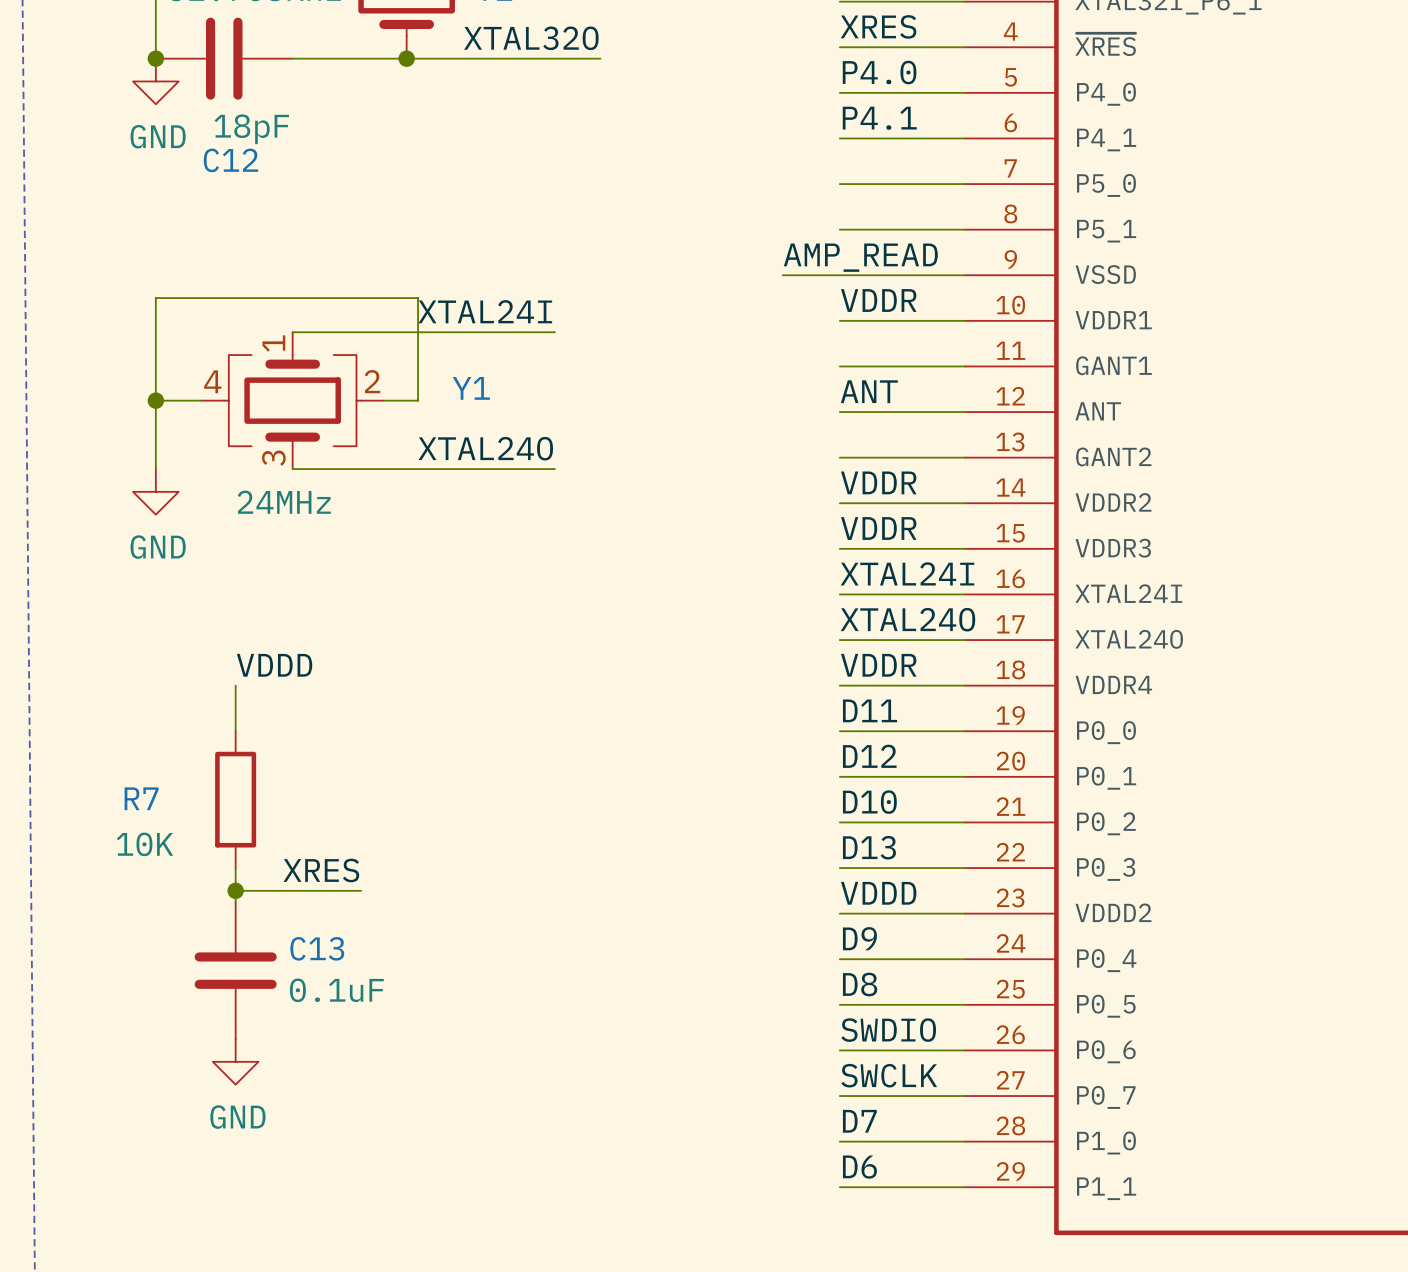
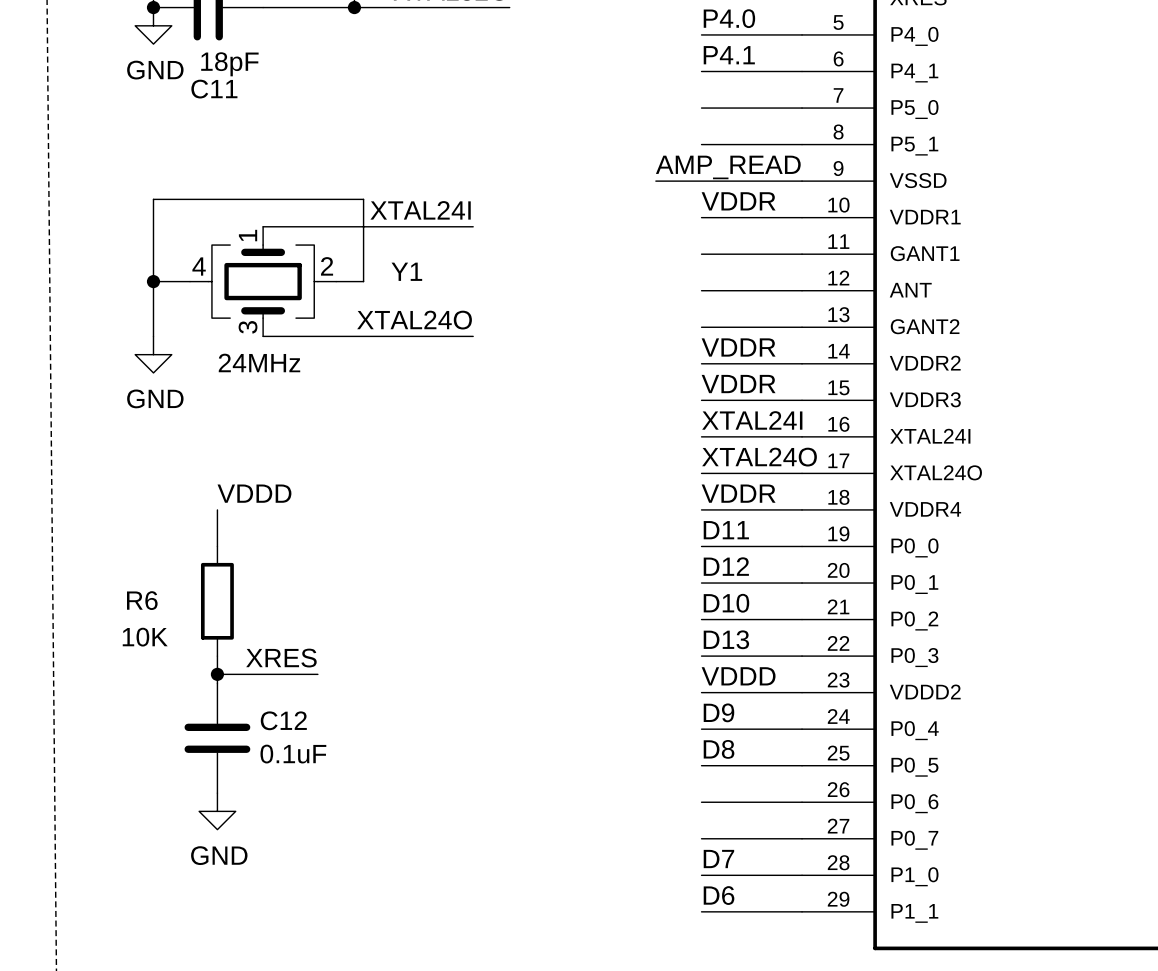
C12 name: C12 (230, 160) -> C11 (214, 89)
label: ANT (869, 391) -> none
R7 name: R7 (141, 798) -> R6 (142, 600)
C13 name: C13 (317, 948) -> C12 (283, 720)
label: SWDIO (888, 1030) -> none
label: SWCLK (889, 1075) -> none

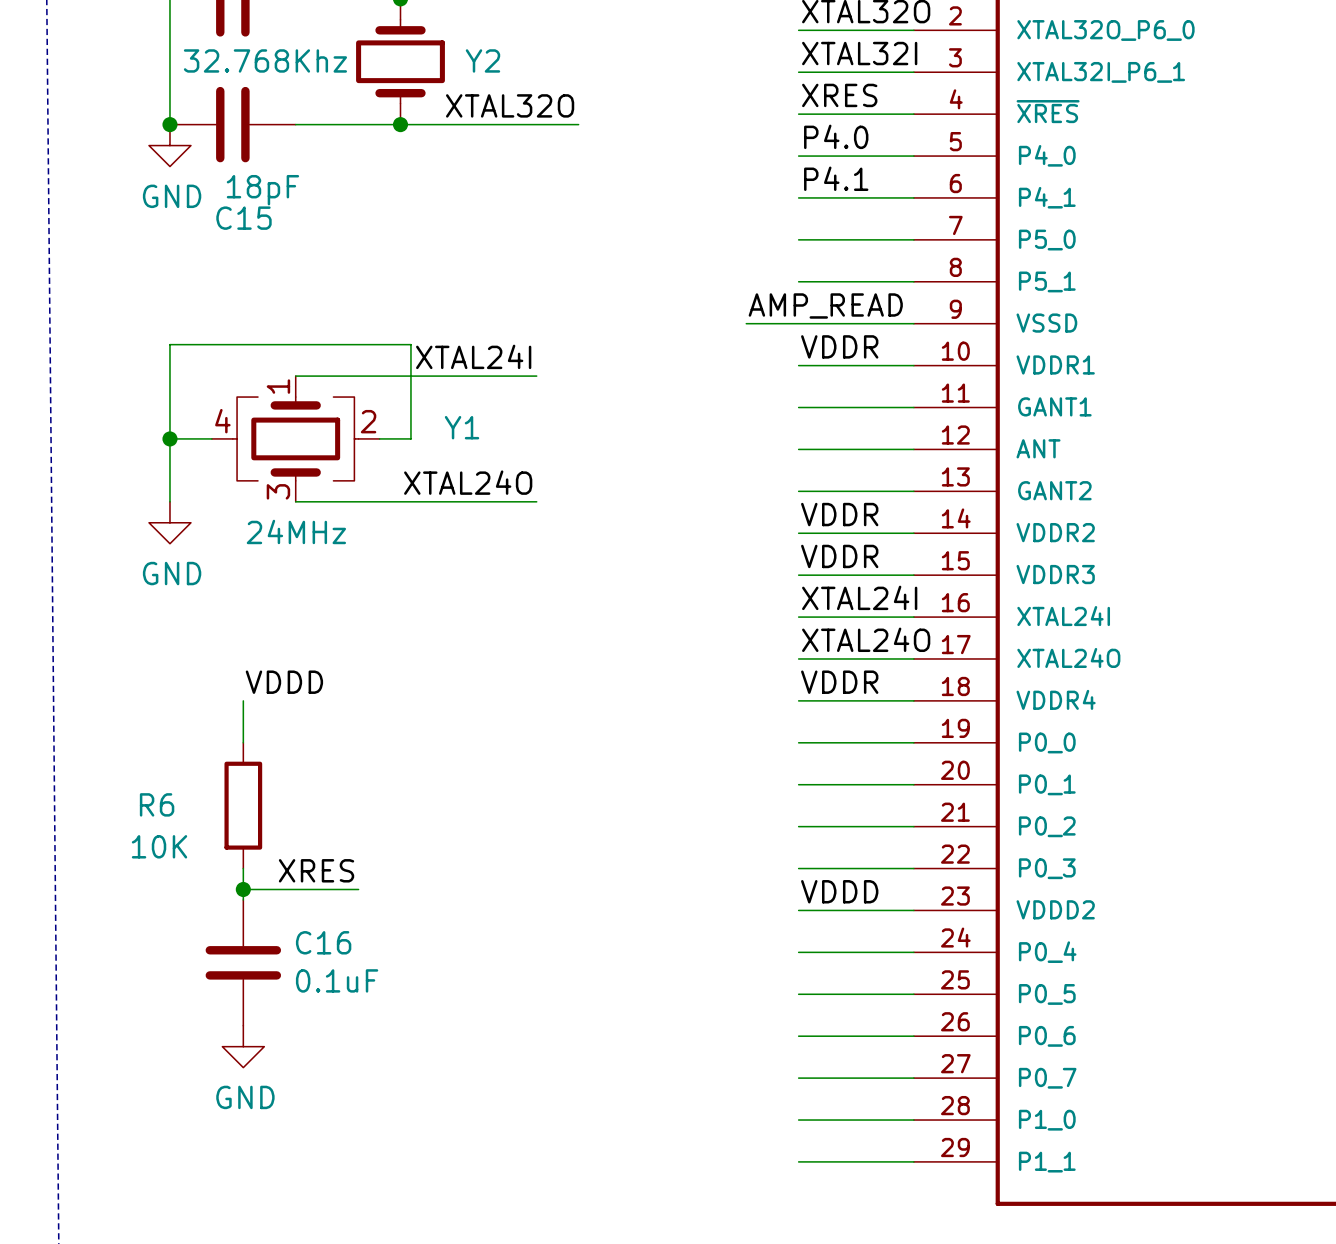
C11 name: C11 (214, 89) -> C15 (243, 218)
label: D11 (726, 530) -> none
label: D12 (726, 566) -> none
label: D10 (726, 603) -> none
label: D13 (726, 639) -> none
label: D9 (718, 712) -> none
C12 name: C12 (283, 720) -> C16 (323, 942)
label: D8 (719, 749) -> none
label: D7 (718, 859) -> none
label: D6 (719, 895) -> none

